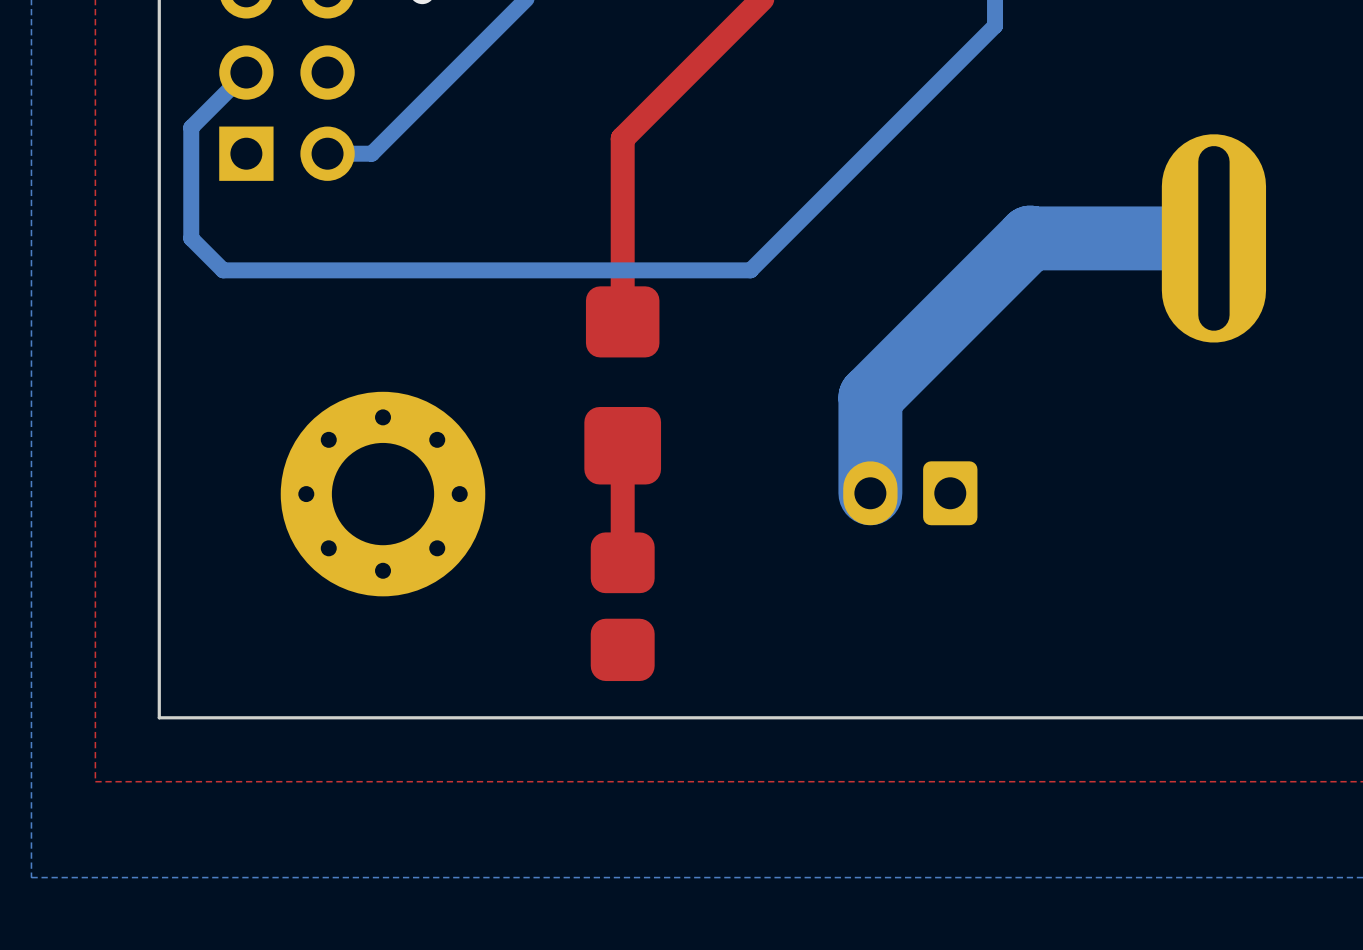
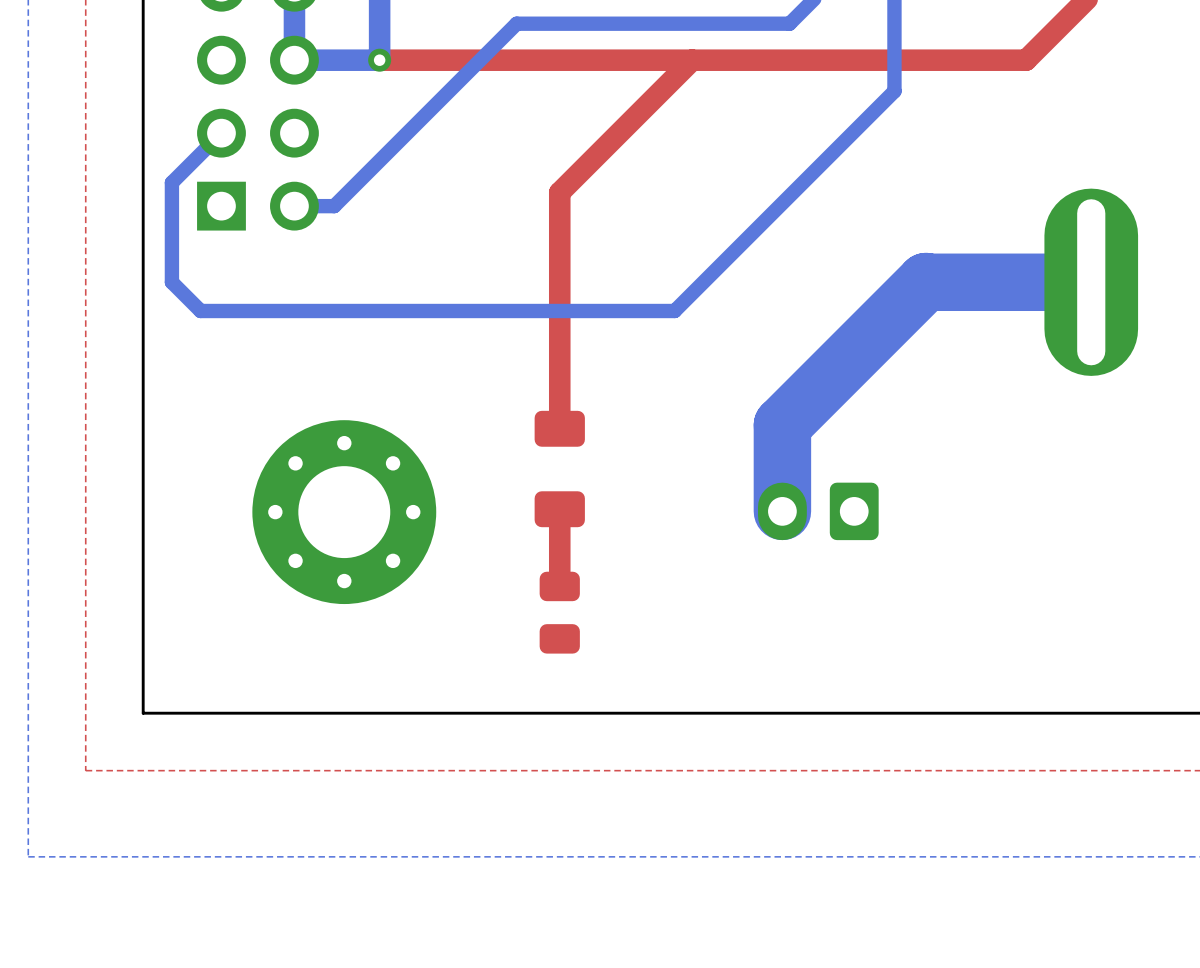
top track: none -> (559, 357) (559, 426)
part: (622, 385) -> none
part: none -> (559, 469)
part footprint: [590, 532, 655, 682] -> [539, 571, 580, 654]

